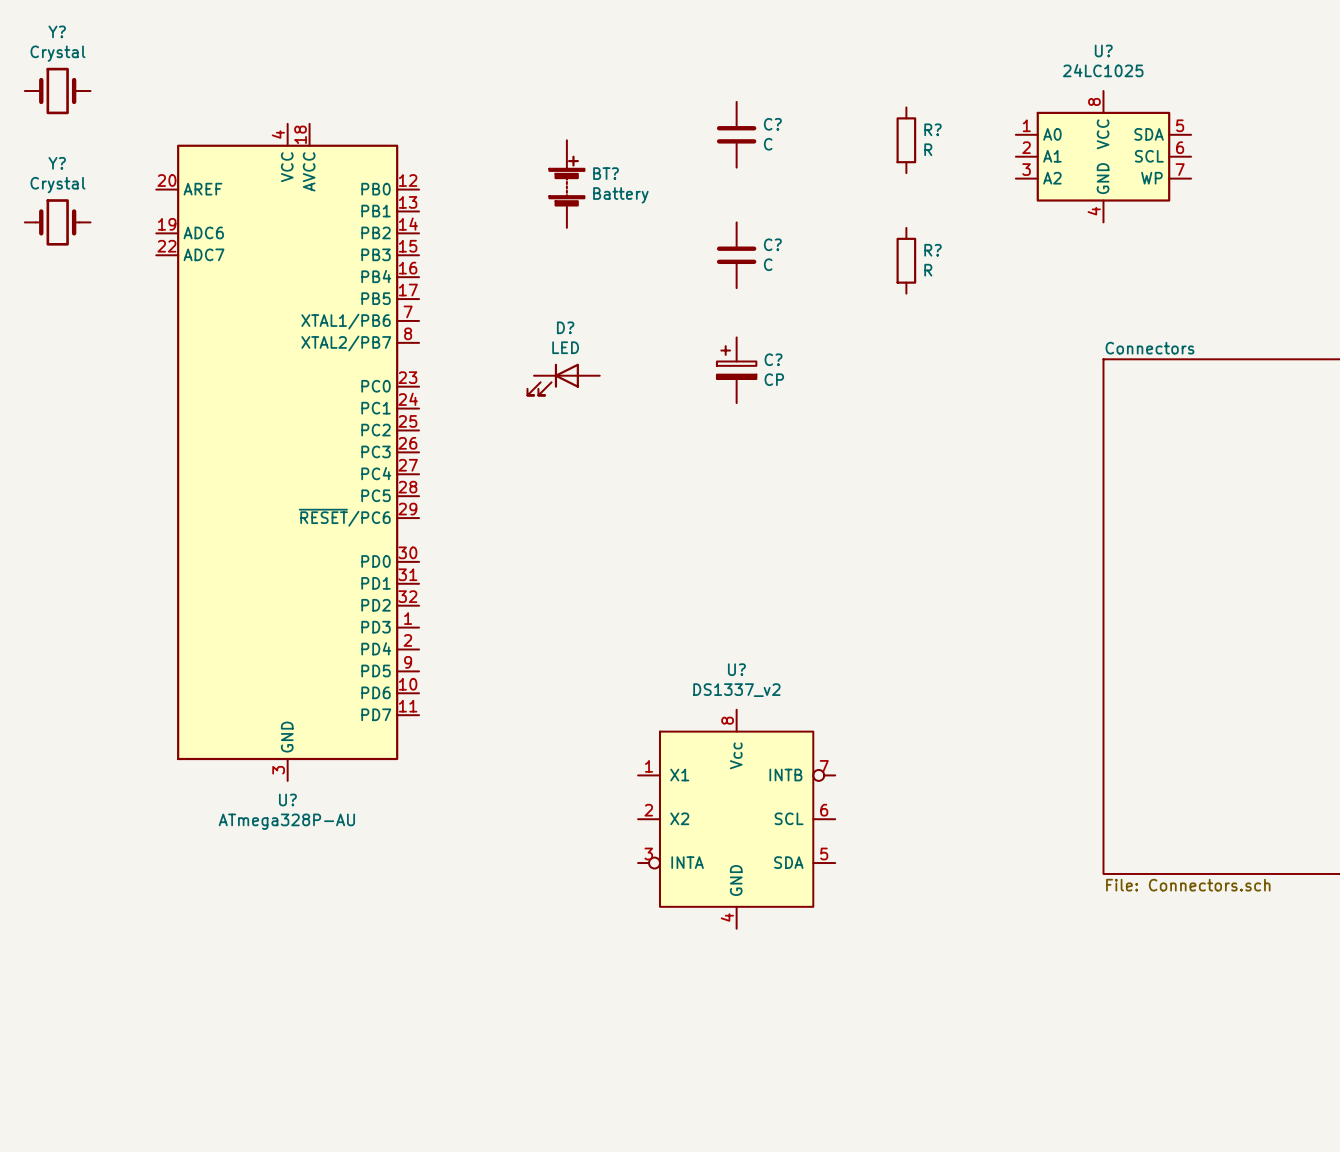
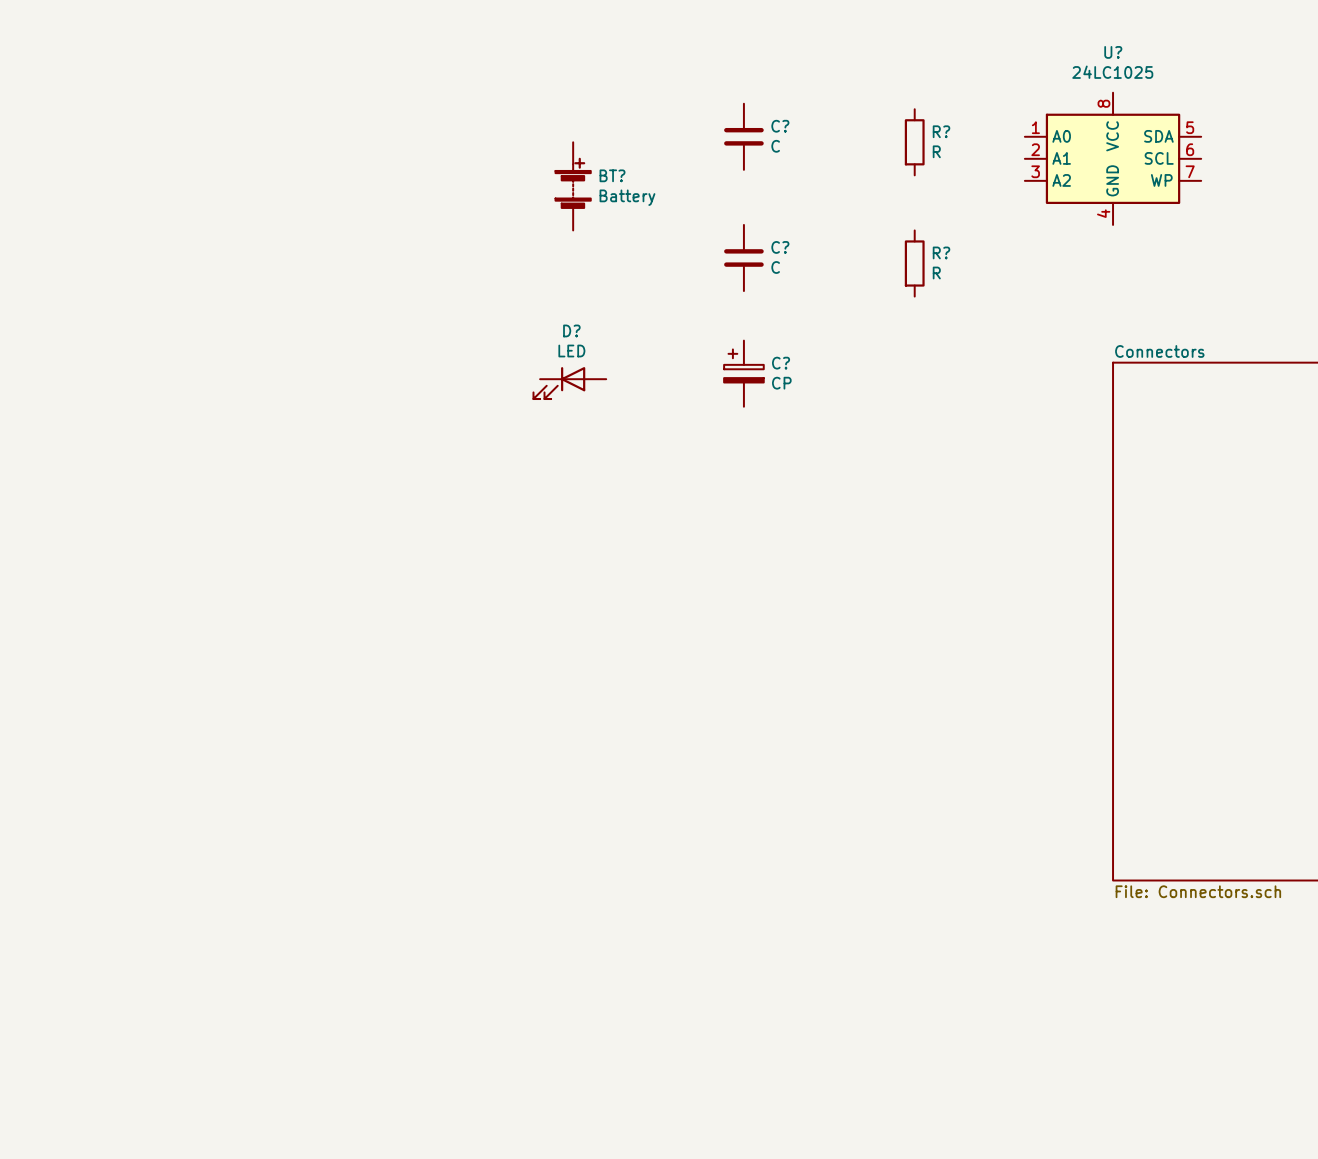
Y?: Crystal (57, 91) -> none
Y?: Crystal (57, 222) -> none
U?: ATmega328P-AU (287, 452) -> none
U?: DS1337_v2 (736, 819) -> none

